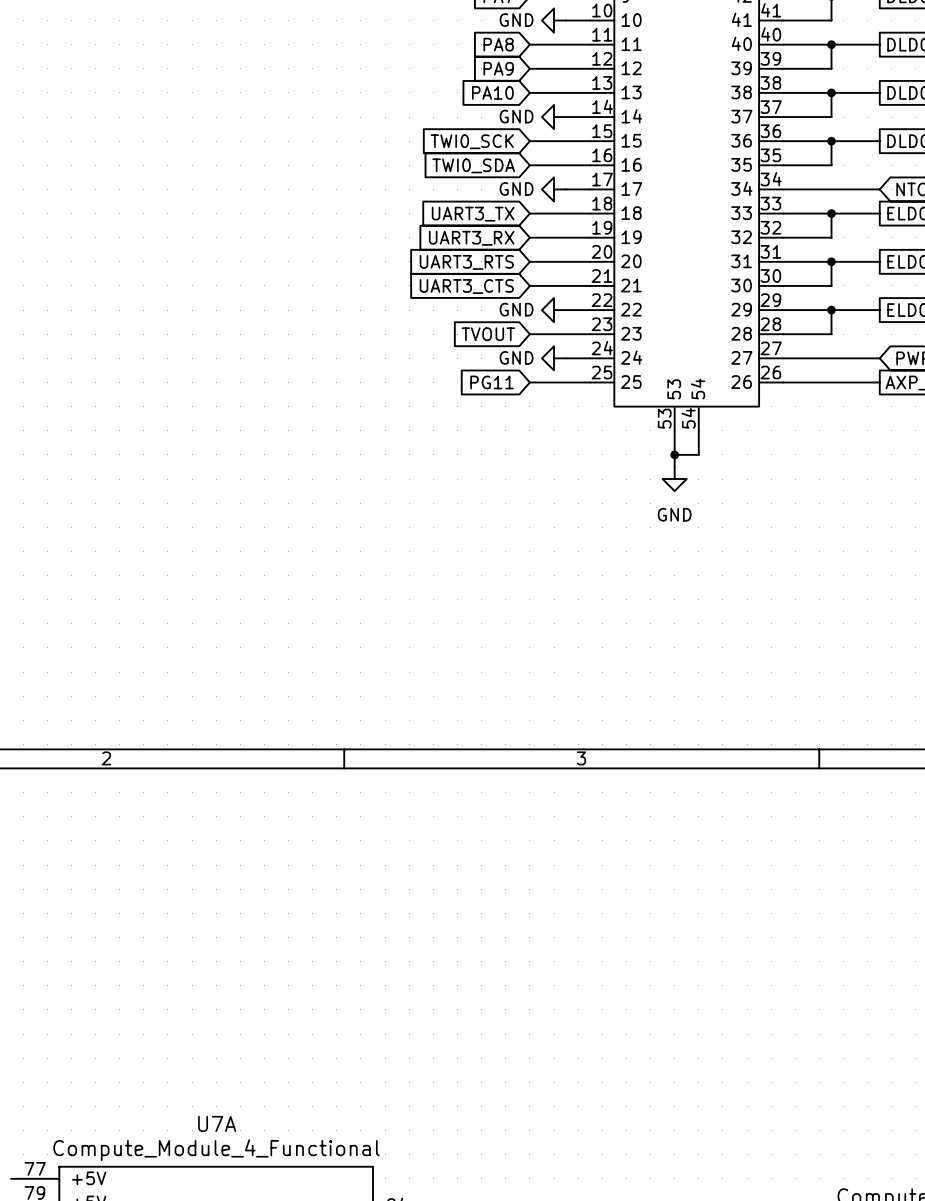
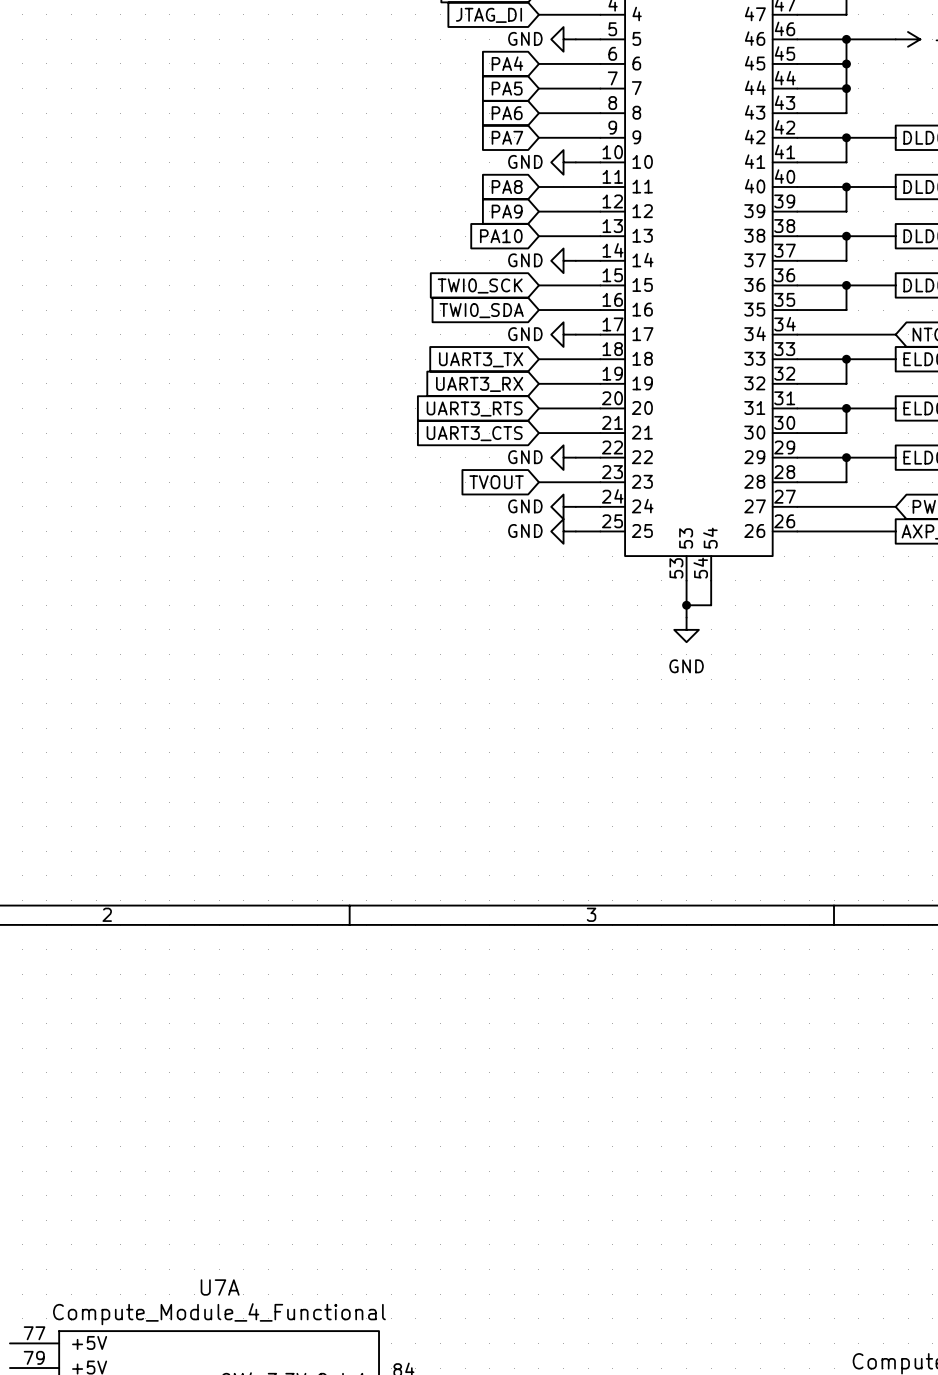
global label: PG11 (492, 382) -> none
wire: (529, 382) (566, 382) -> none
power symbol: none -> GND (563, 531)

